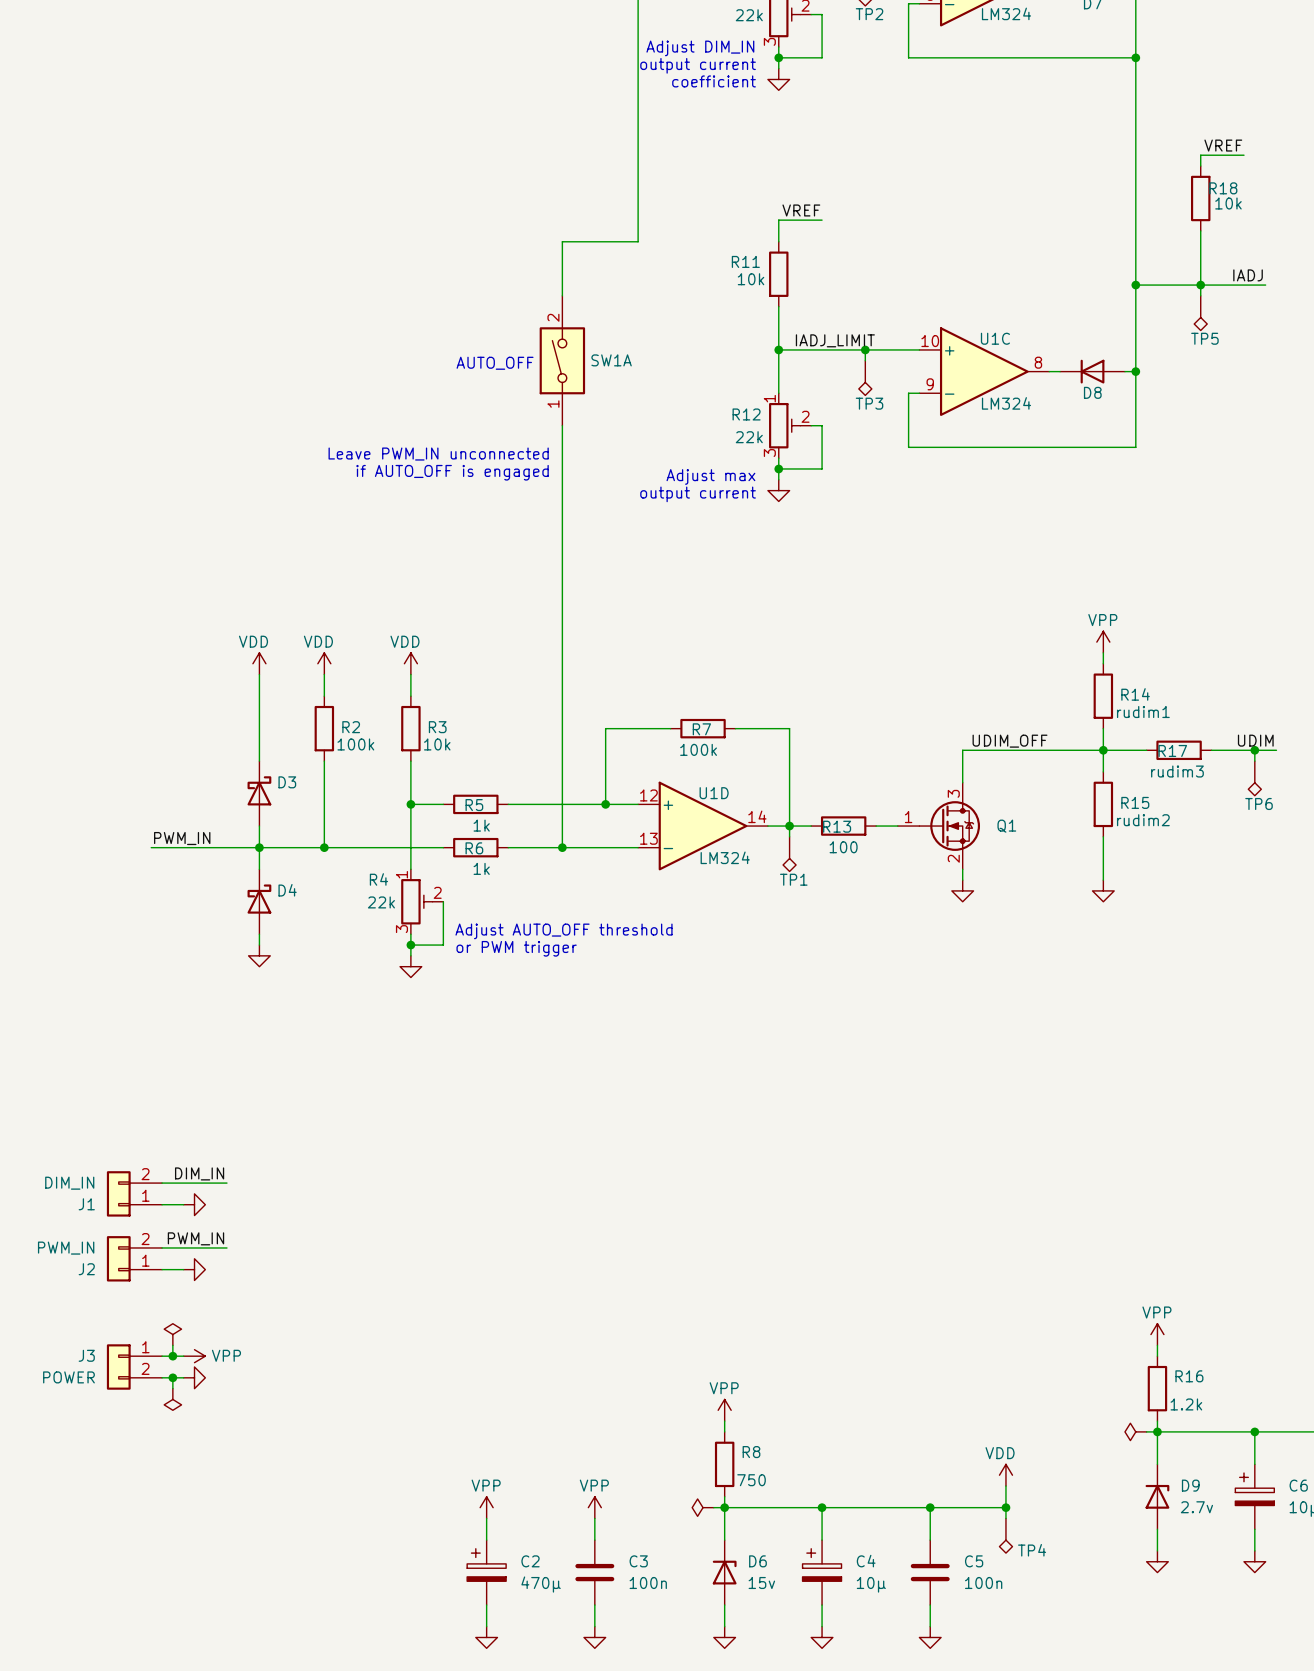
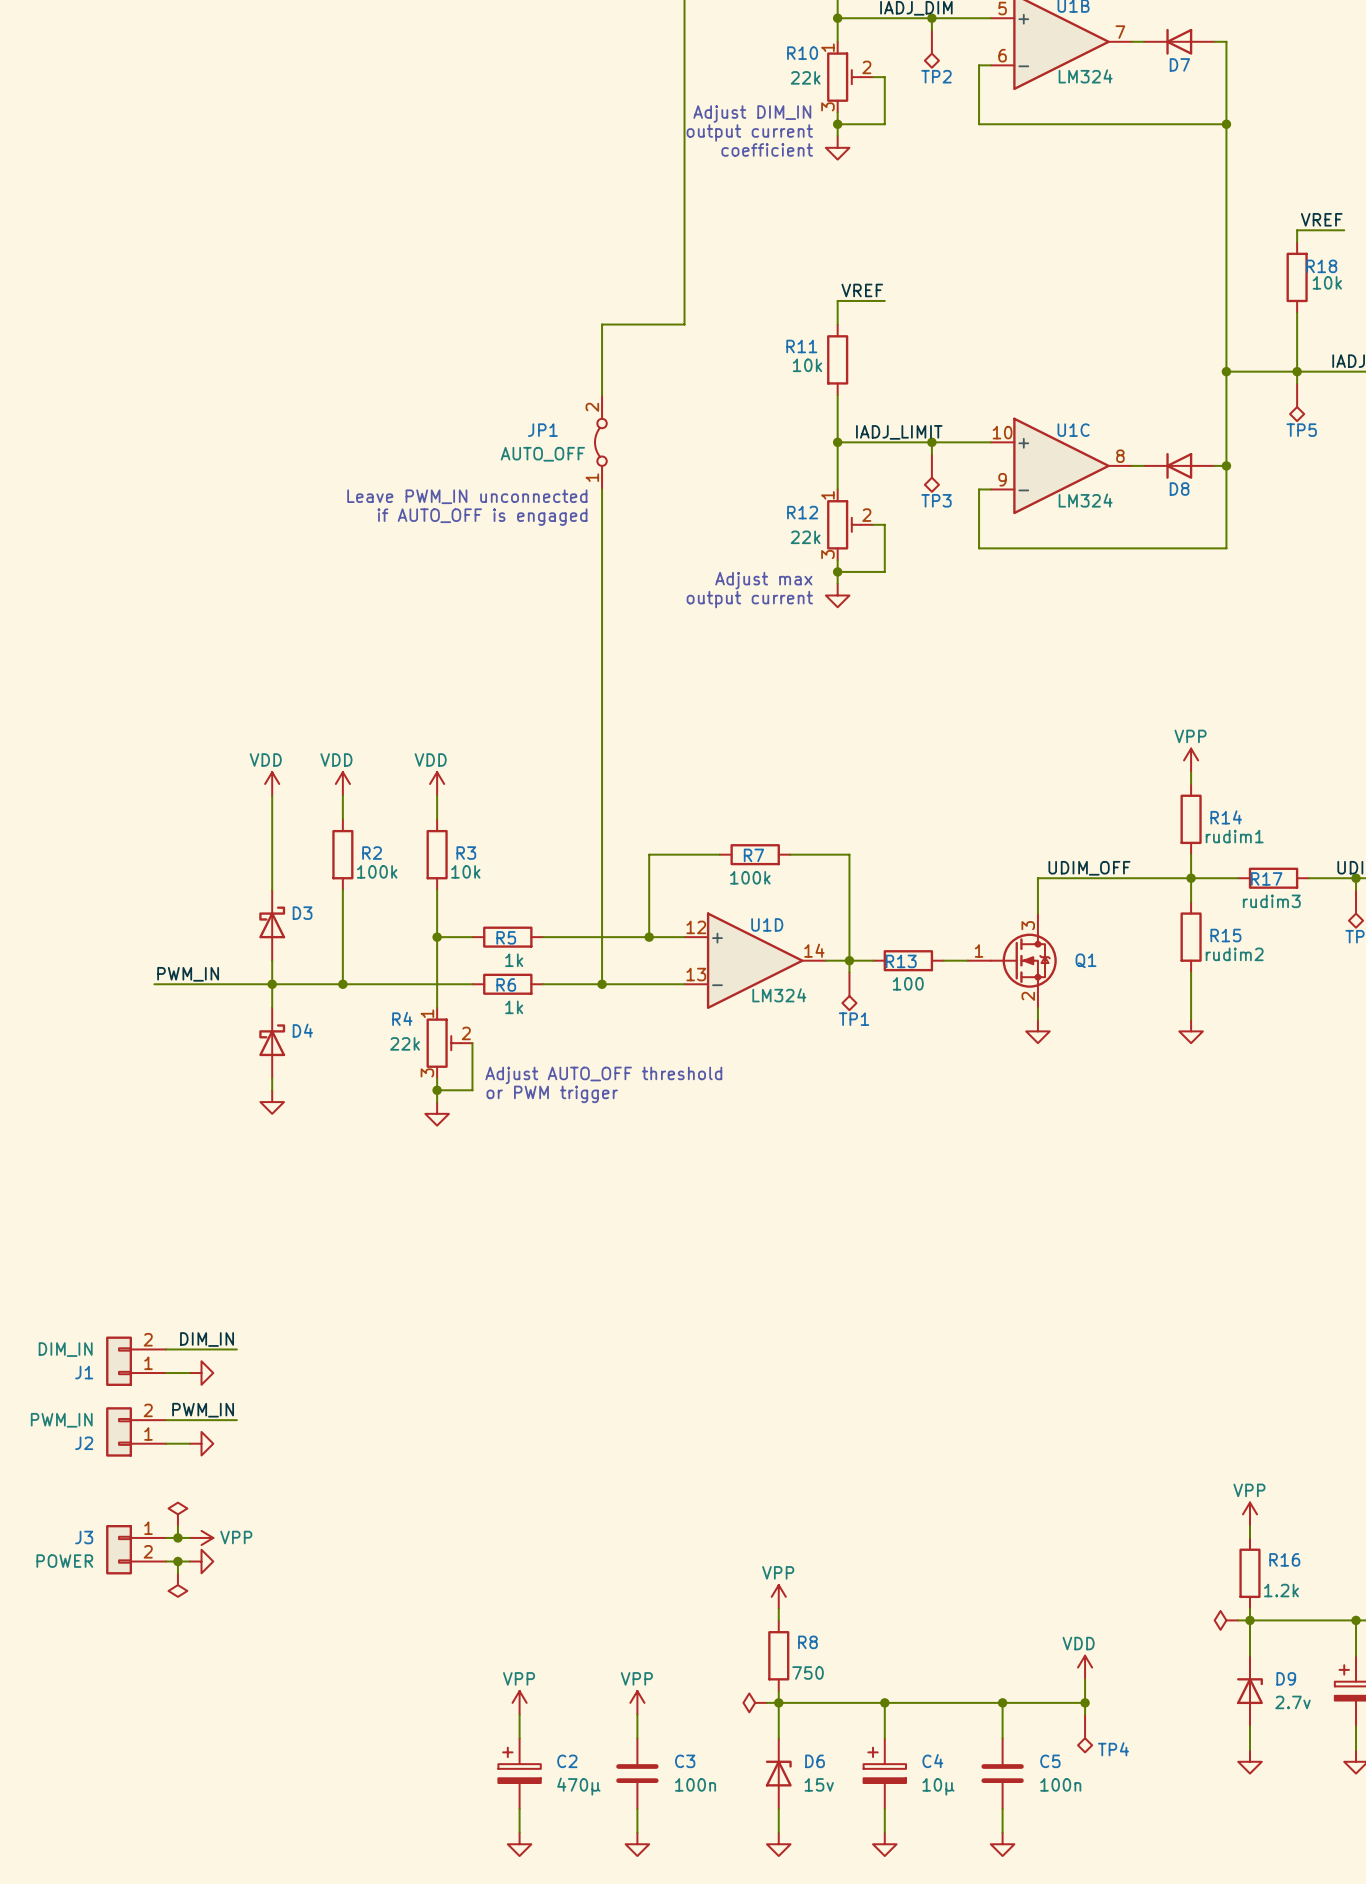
JP1: none -> AUTO_OFF (600, 442)
SW1A: (562, 360) -> none
text: AUTO_OFF (495, 363) -> none
text position: Leave PWM_IN unconnected (438, 454) -> Leave PWM_IN unconnected (467, 496)
text position: if AUTO_OFF is engaged (452, 472) -> if AUTO_OFF is engaged (482, 517)

